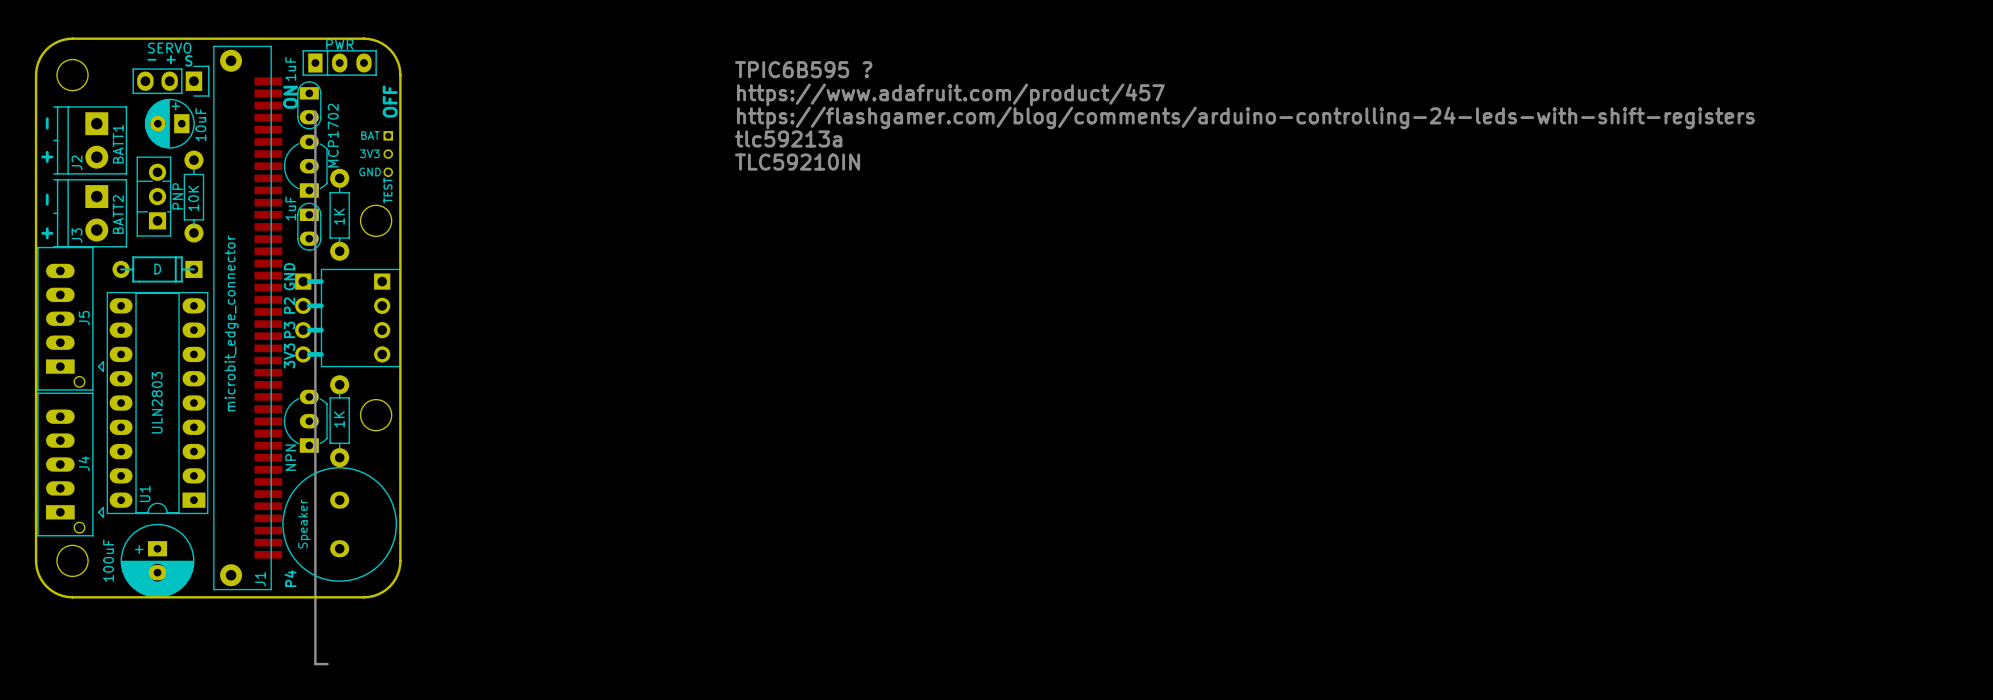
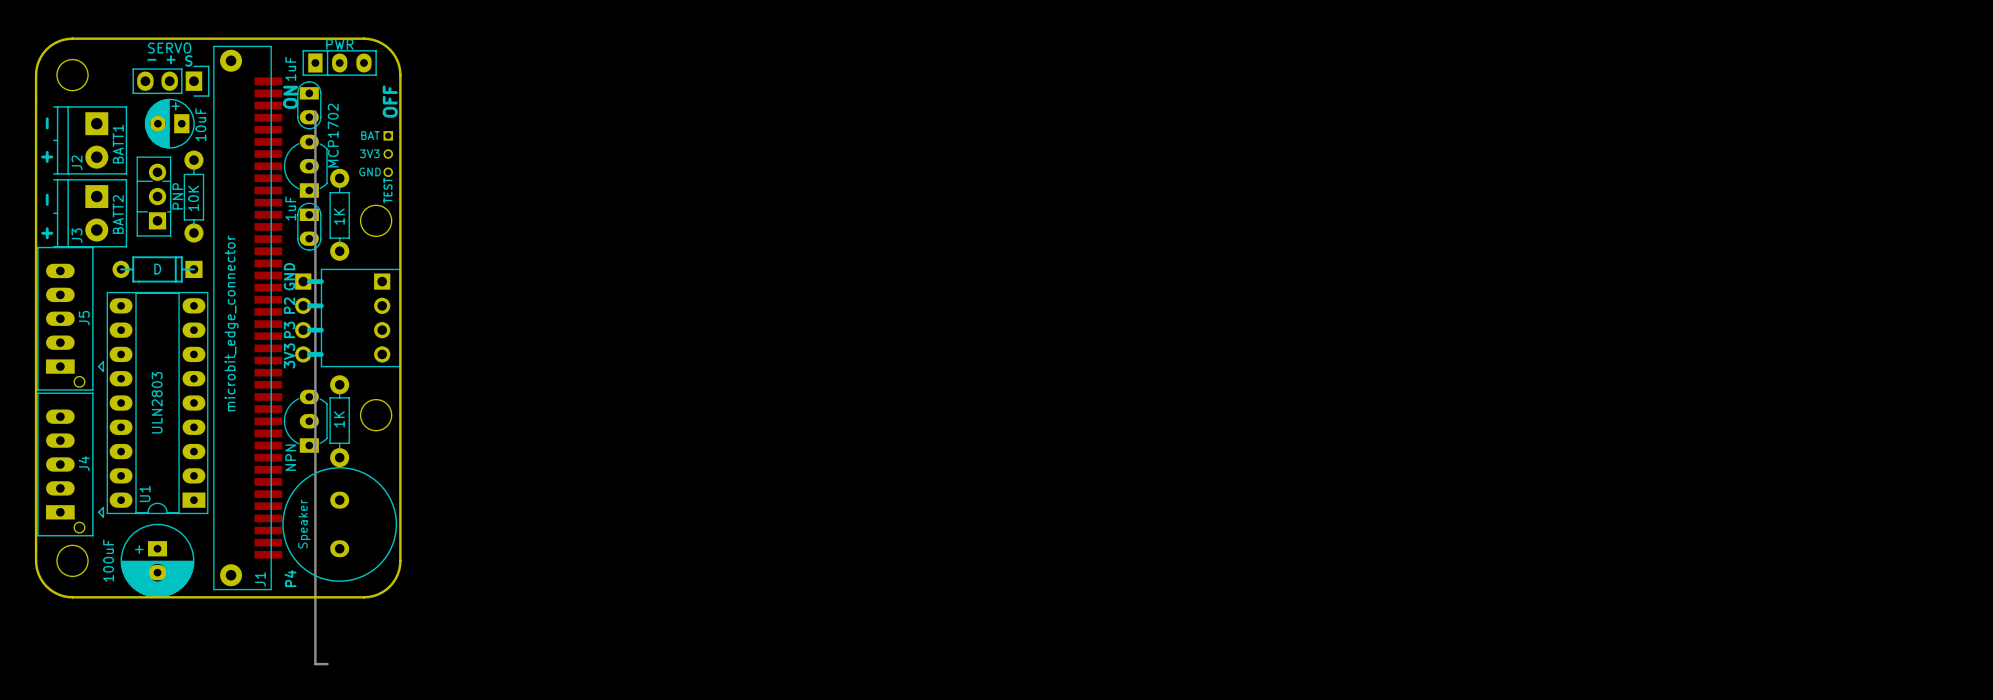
text: TPIC6B595 ? (803, 69) -> none
text: https://www.adafruit.com/product/457 (950, 94) -> none
text: https://flashgamer.com/blog/comments/arduino-controlling-24-leds-with-shift-registers (1245, 117) -> none
text: tlc59213a (788, 138) -> none
text: TLC59210IN (797, 162) -> none

